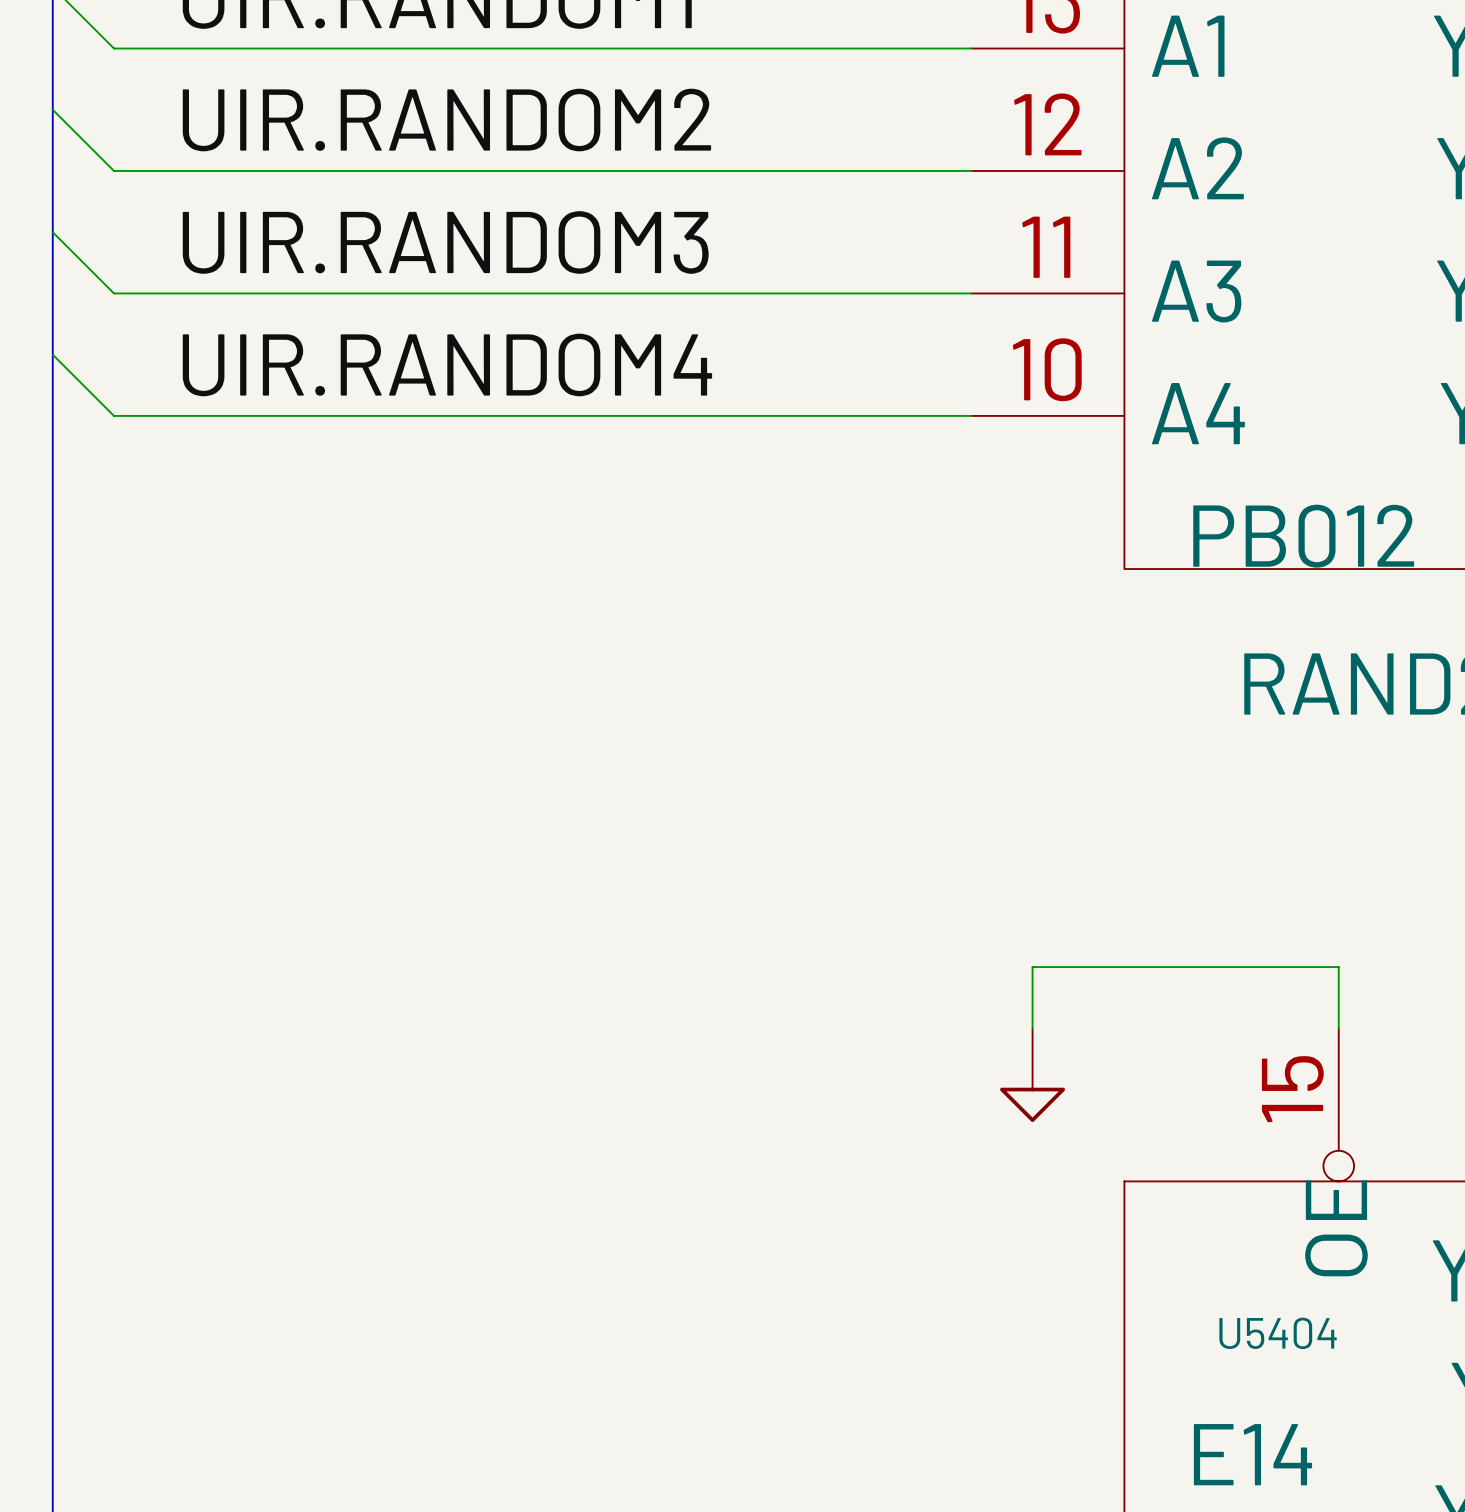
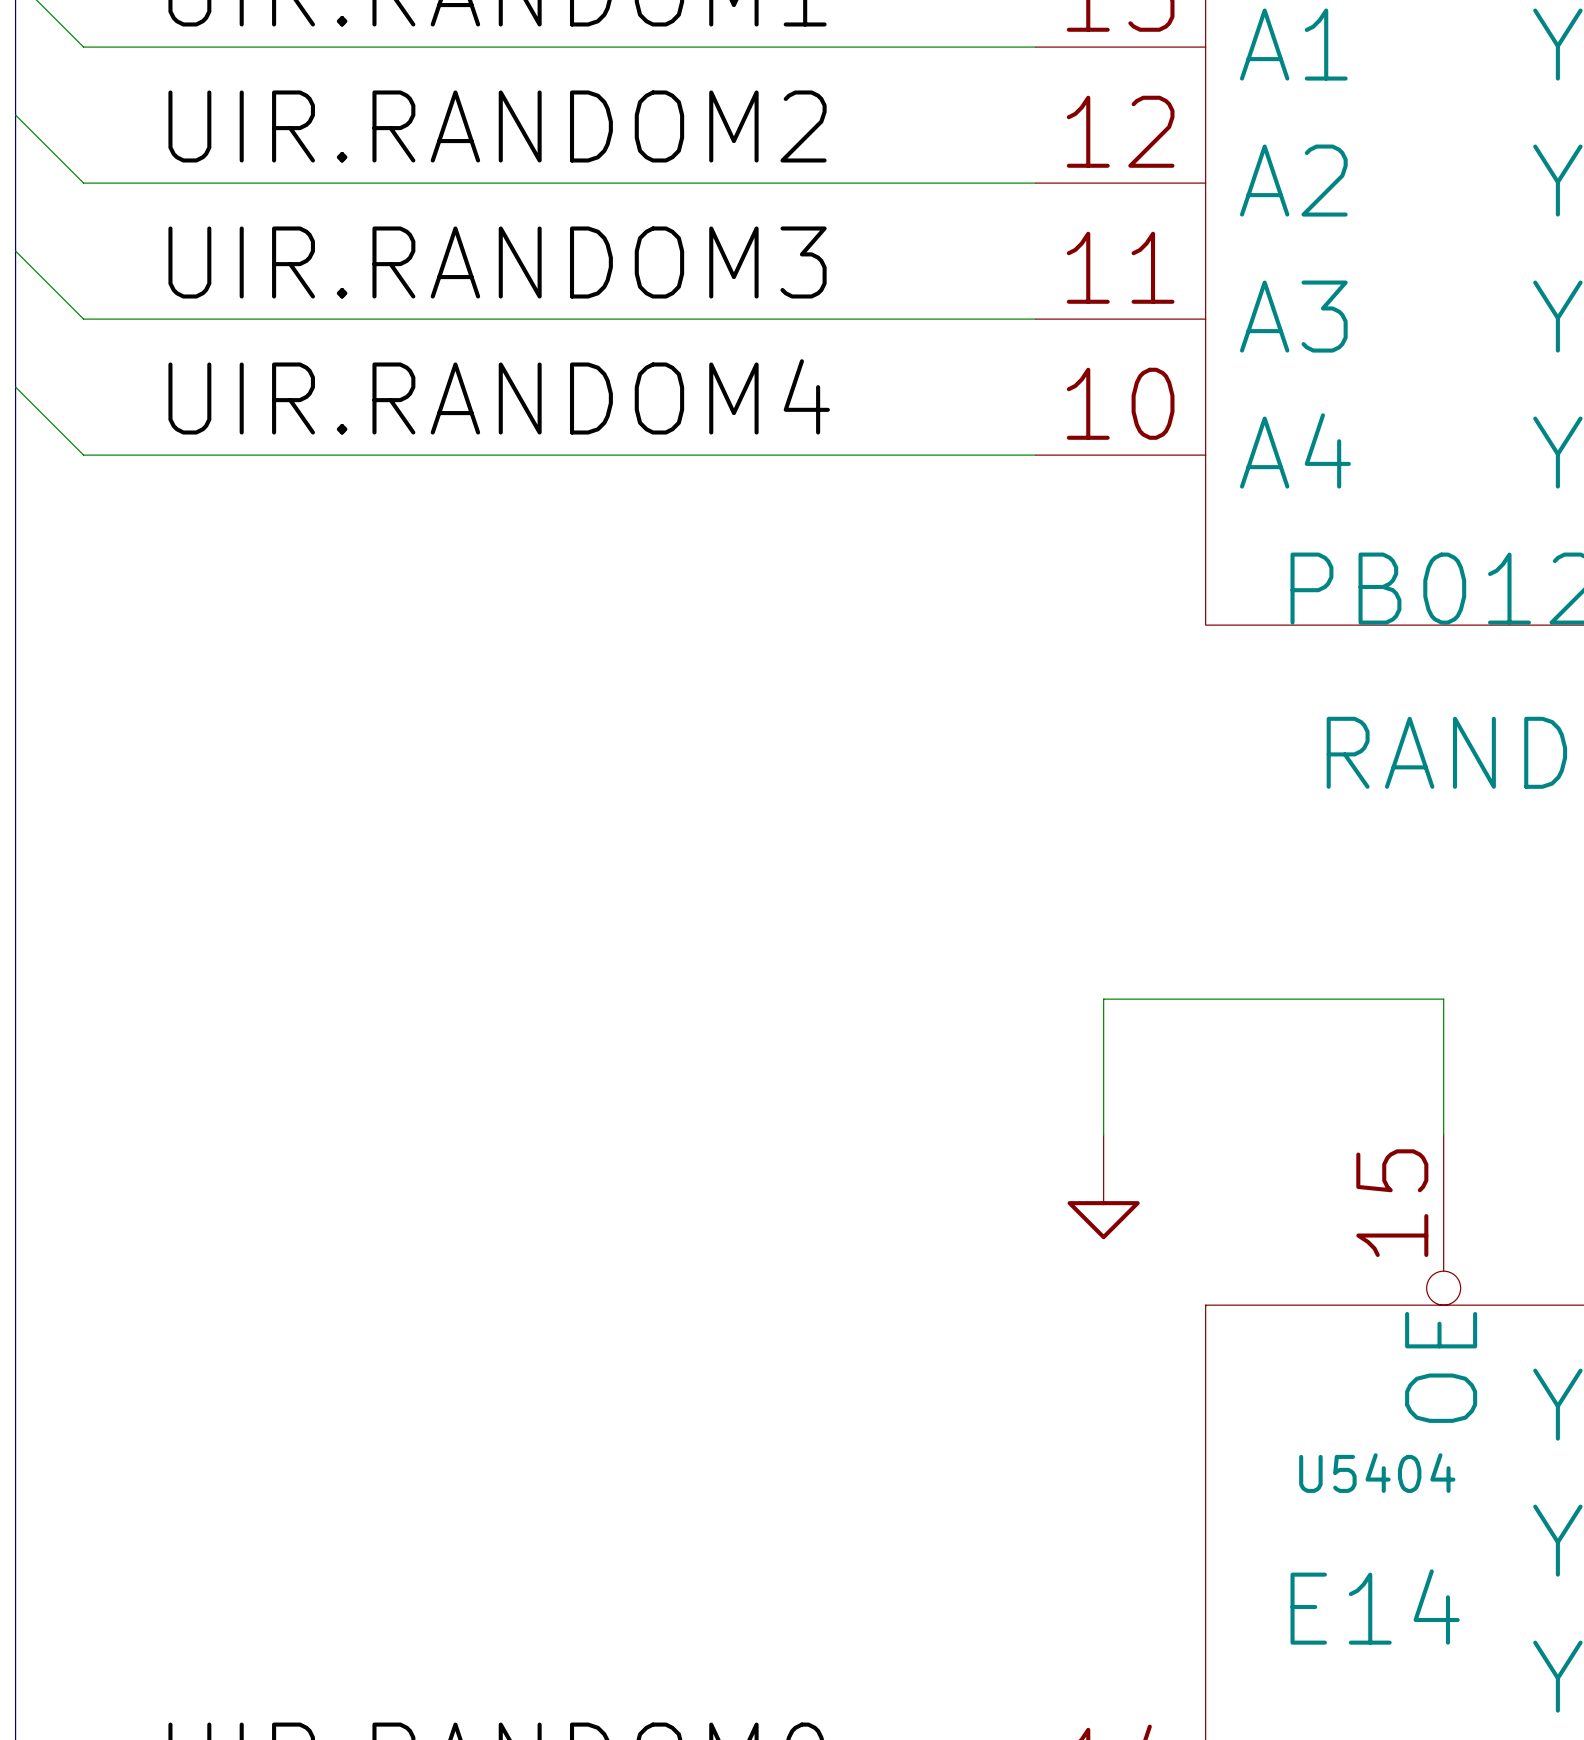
wire: (1032, 967) (1338, 967) -> (1103, 1067) (1103, 999) (1443, 999) (1443, 1067)

